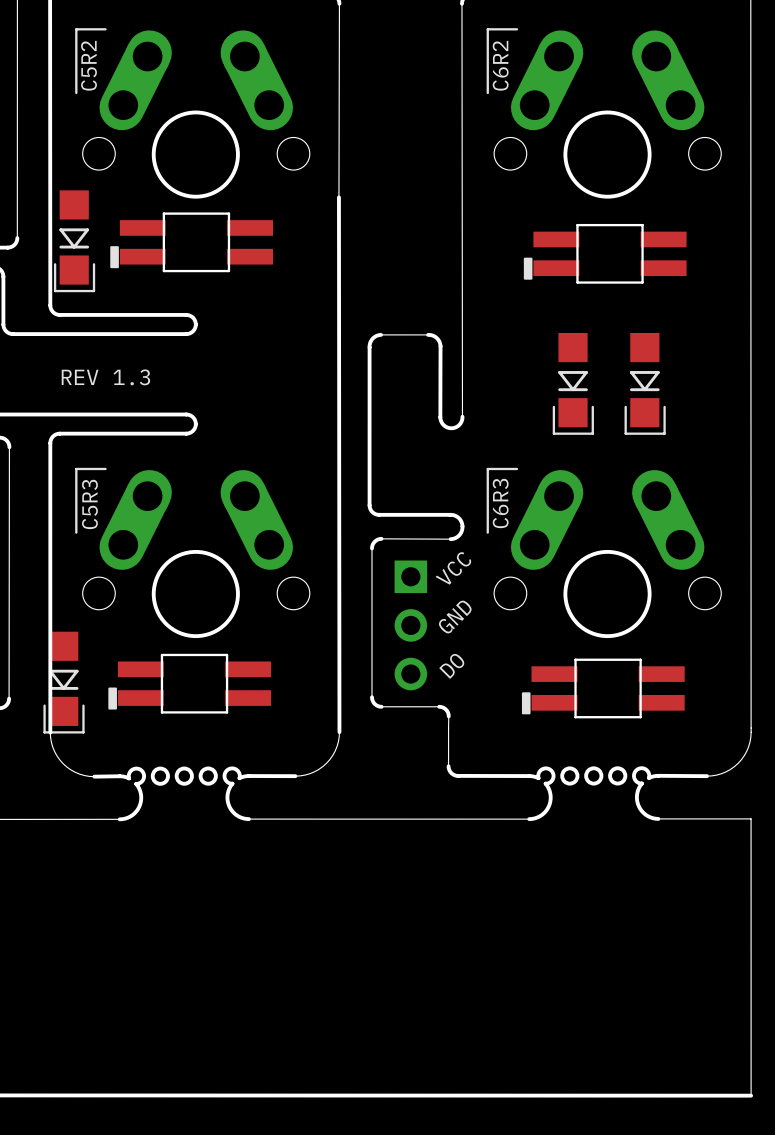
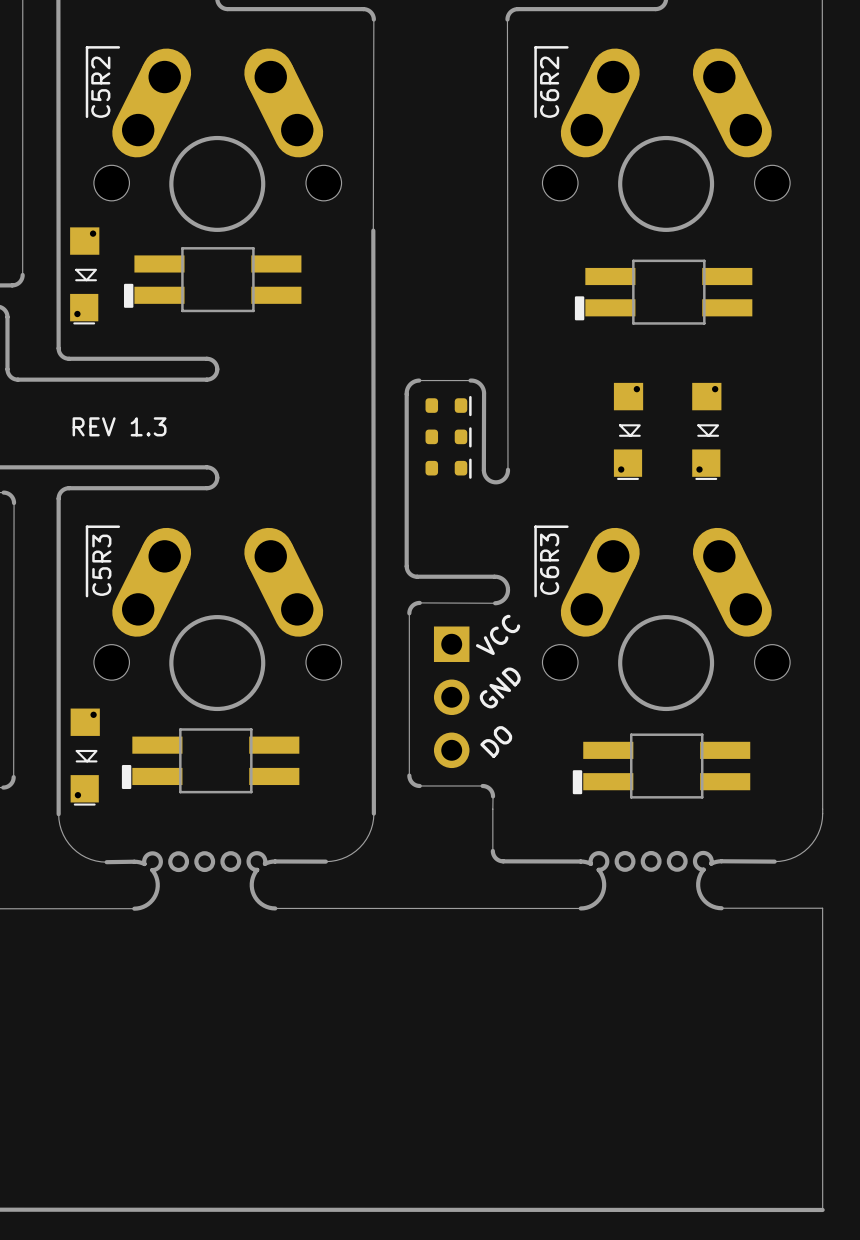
part footprint: [53, 190, 96, 293] -> [70, 227, 100, 325]
part footprint: [552, 332, 594, 435] -> [613, 382, 644, 480]
part footprint: [624, 332, 666, 435] -> [692, 382, 722, 480]
part: none -> (448, 406)
part: none -> (448, 437)
part: none -> (448, 468)
part footprint: [43, 631, 85, 734] -> [70, 708, 100, 806]

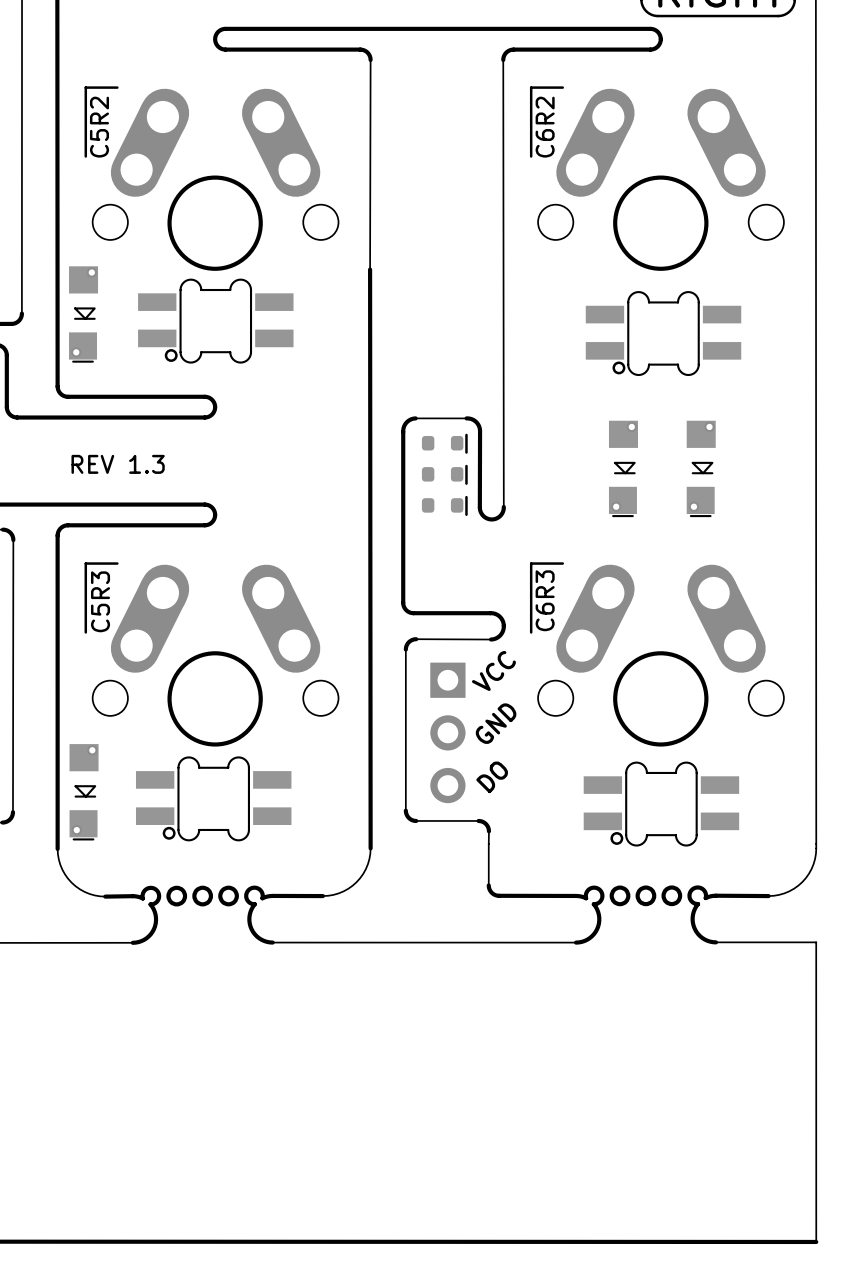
part footprint: [123, 247, 302, 313] -> [138, 278, 294, 364]
part footprint: [574, 259, 753, 325] -> [585, 291, 742, 377]
part footprint: [121, 728, 300, 794] -> [135, 756, 292, 842]
part footprint: [572, 733, 751, 799] -> [583, 761, 740, 847]

